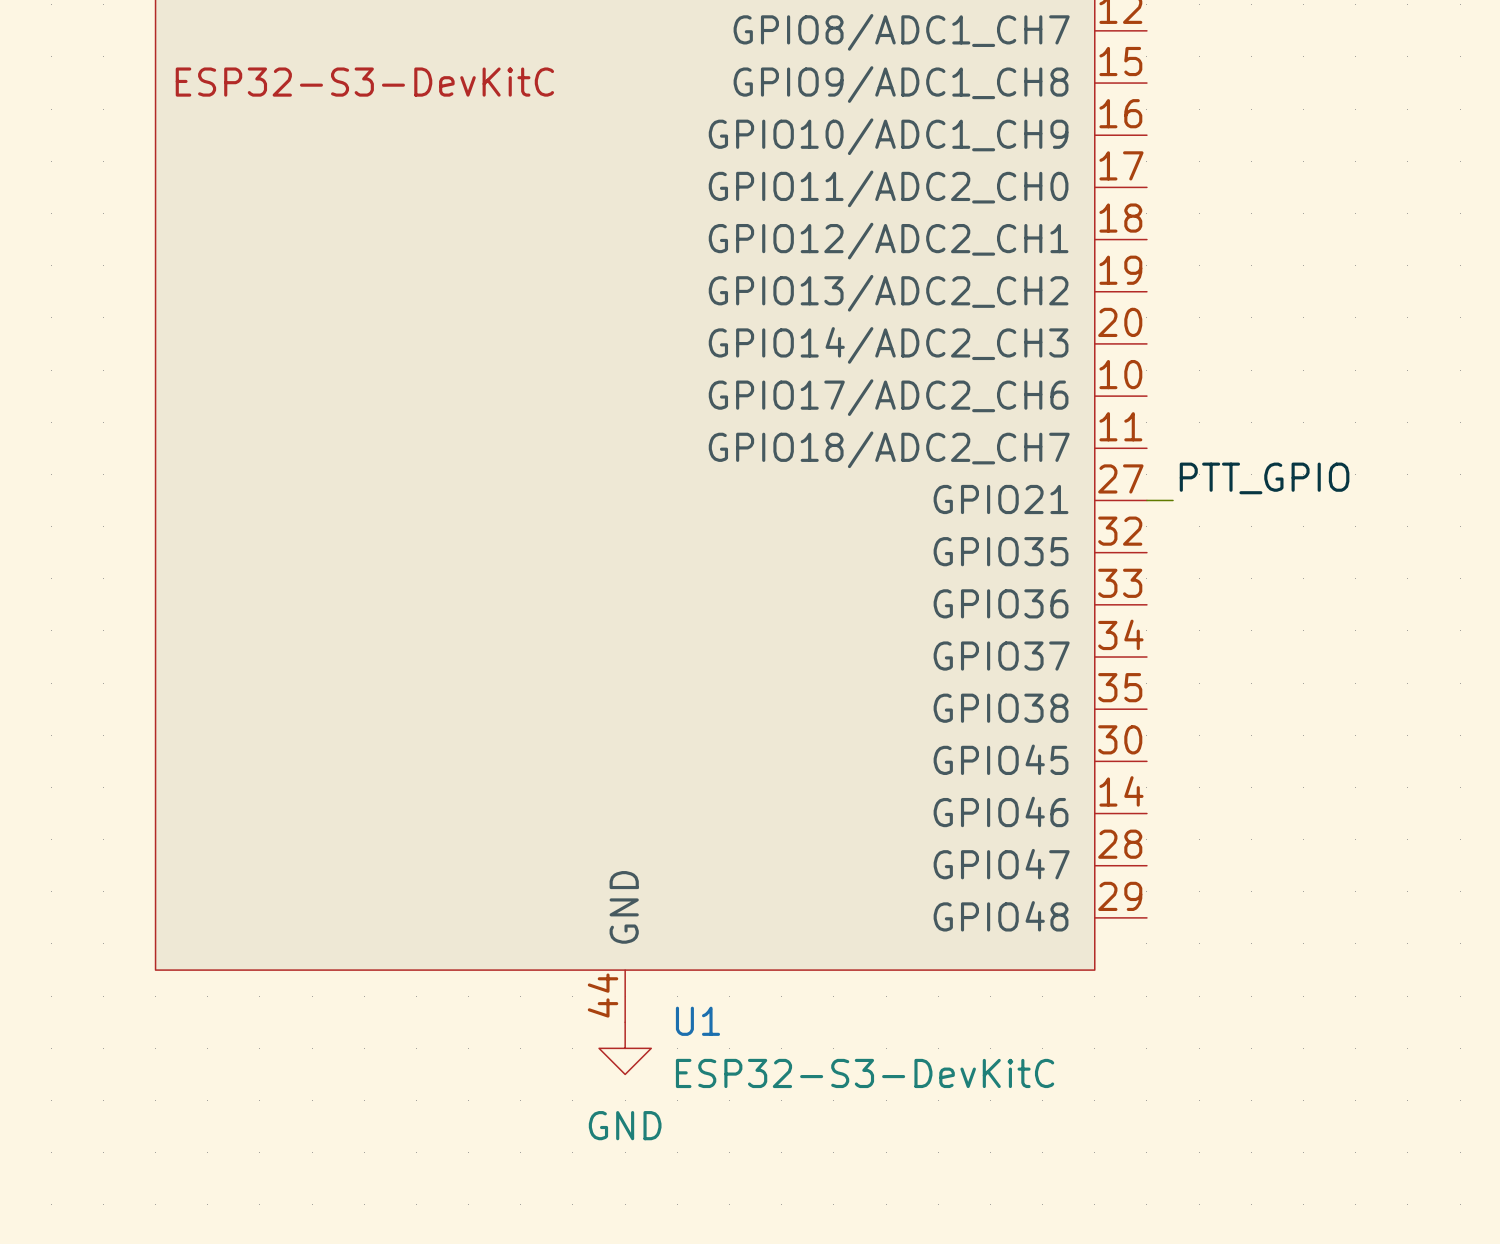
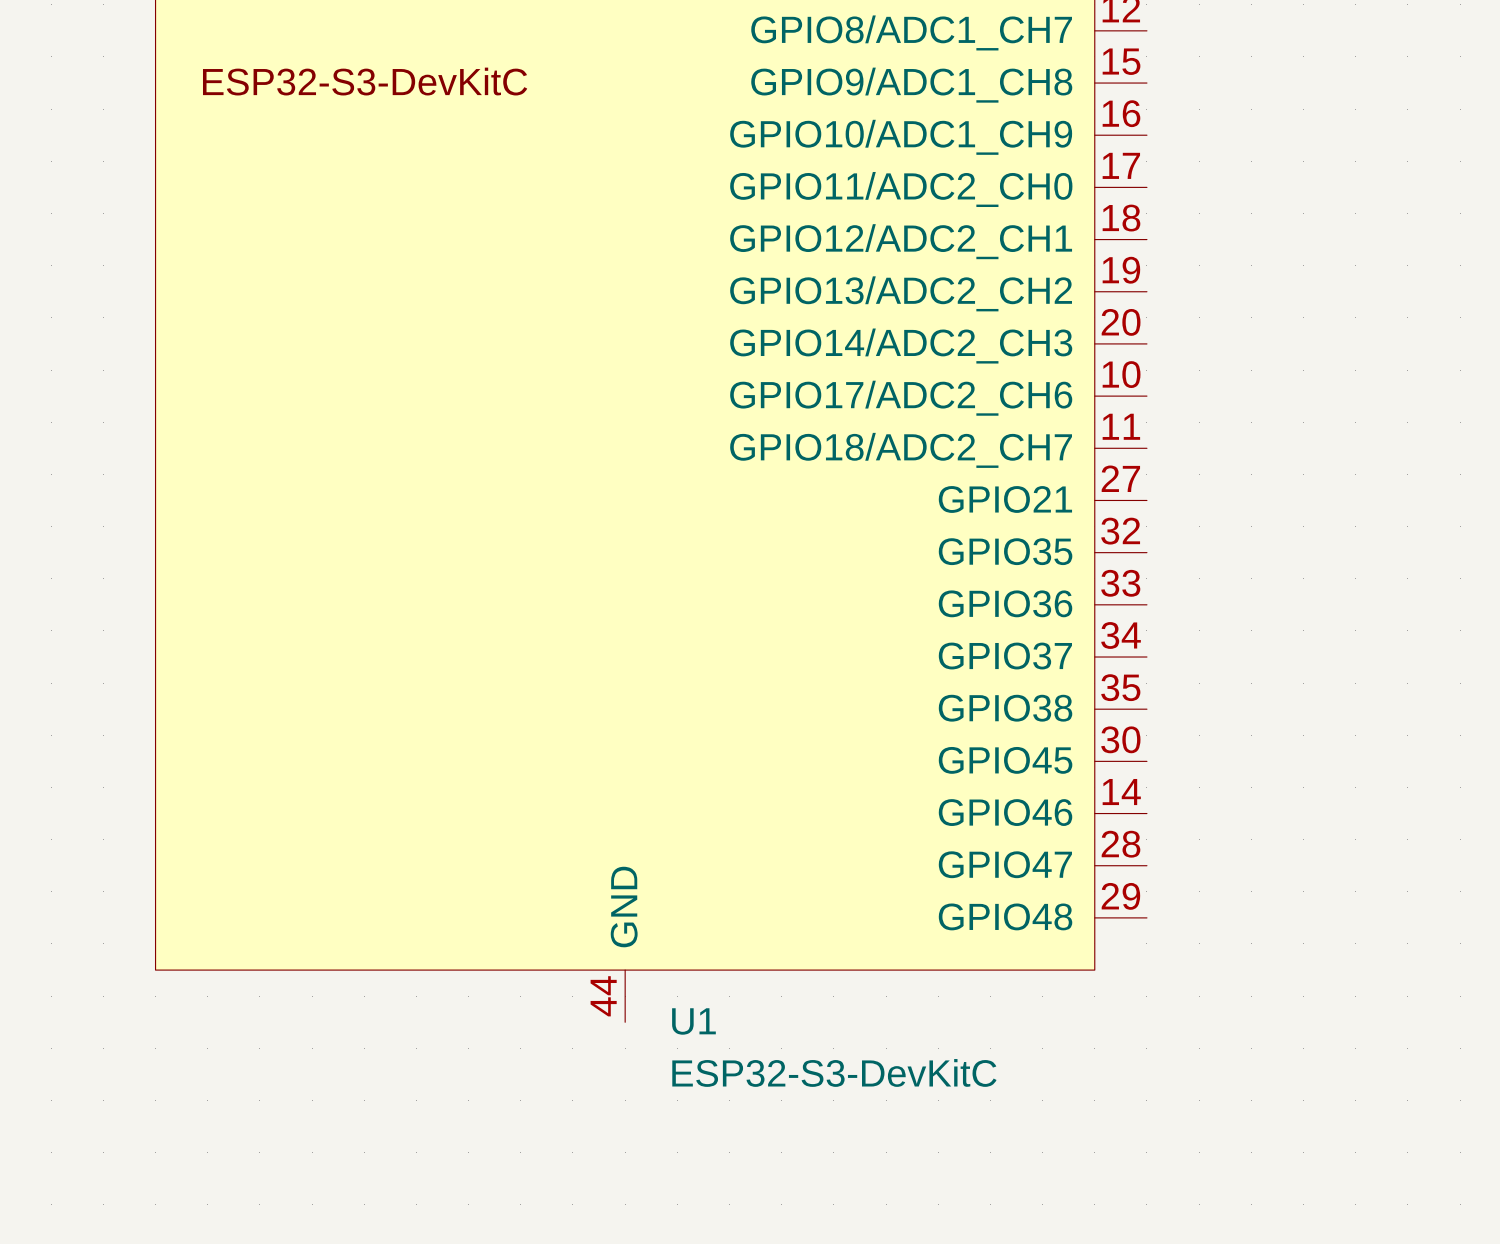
label: PTT_GPIO (1264, 478) -> none
wire: (1146, 500) (1173, 500) -> none
power symbol: GND (625, 1048) -> none

